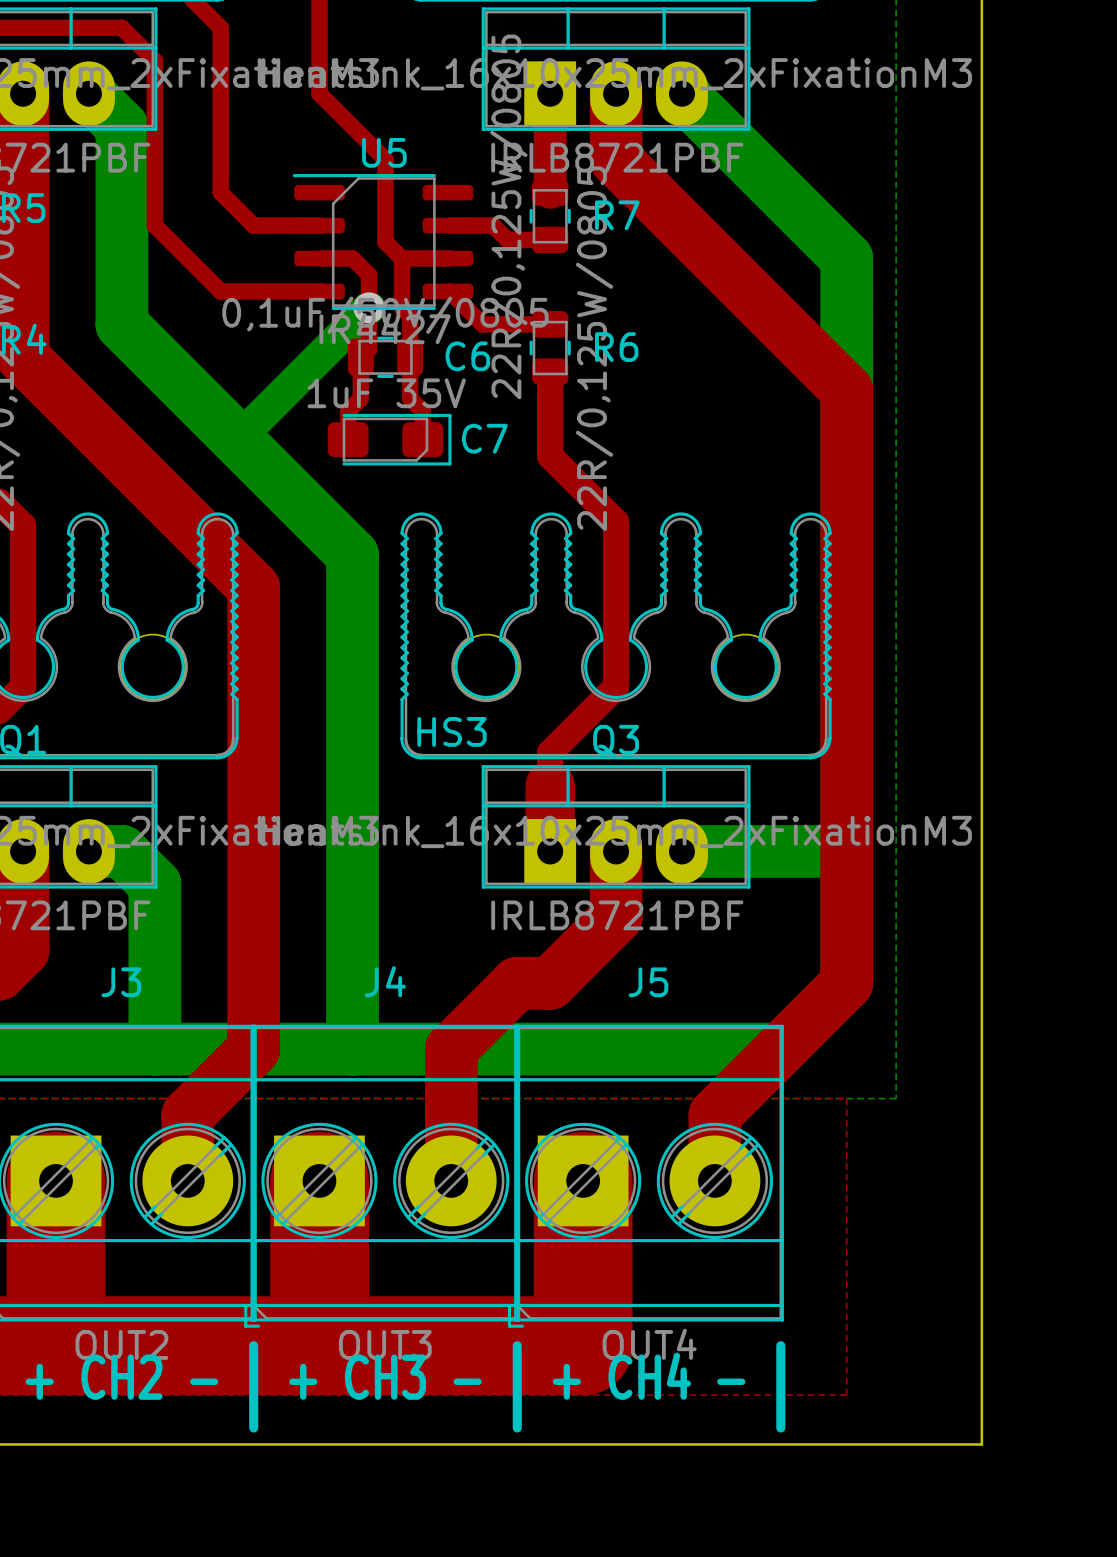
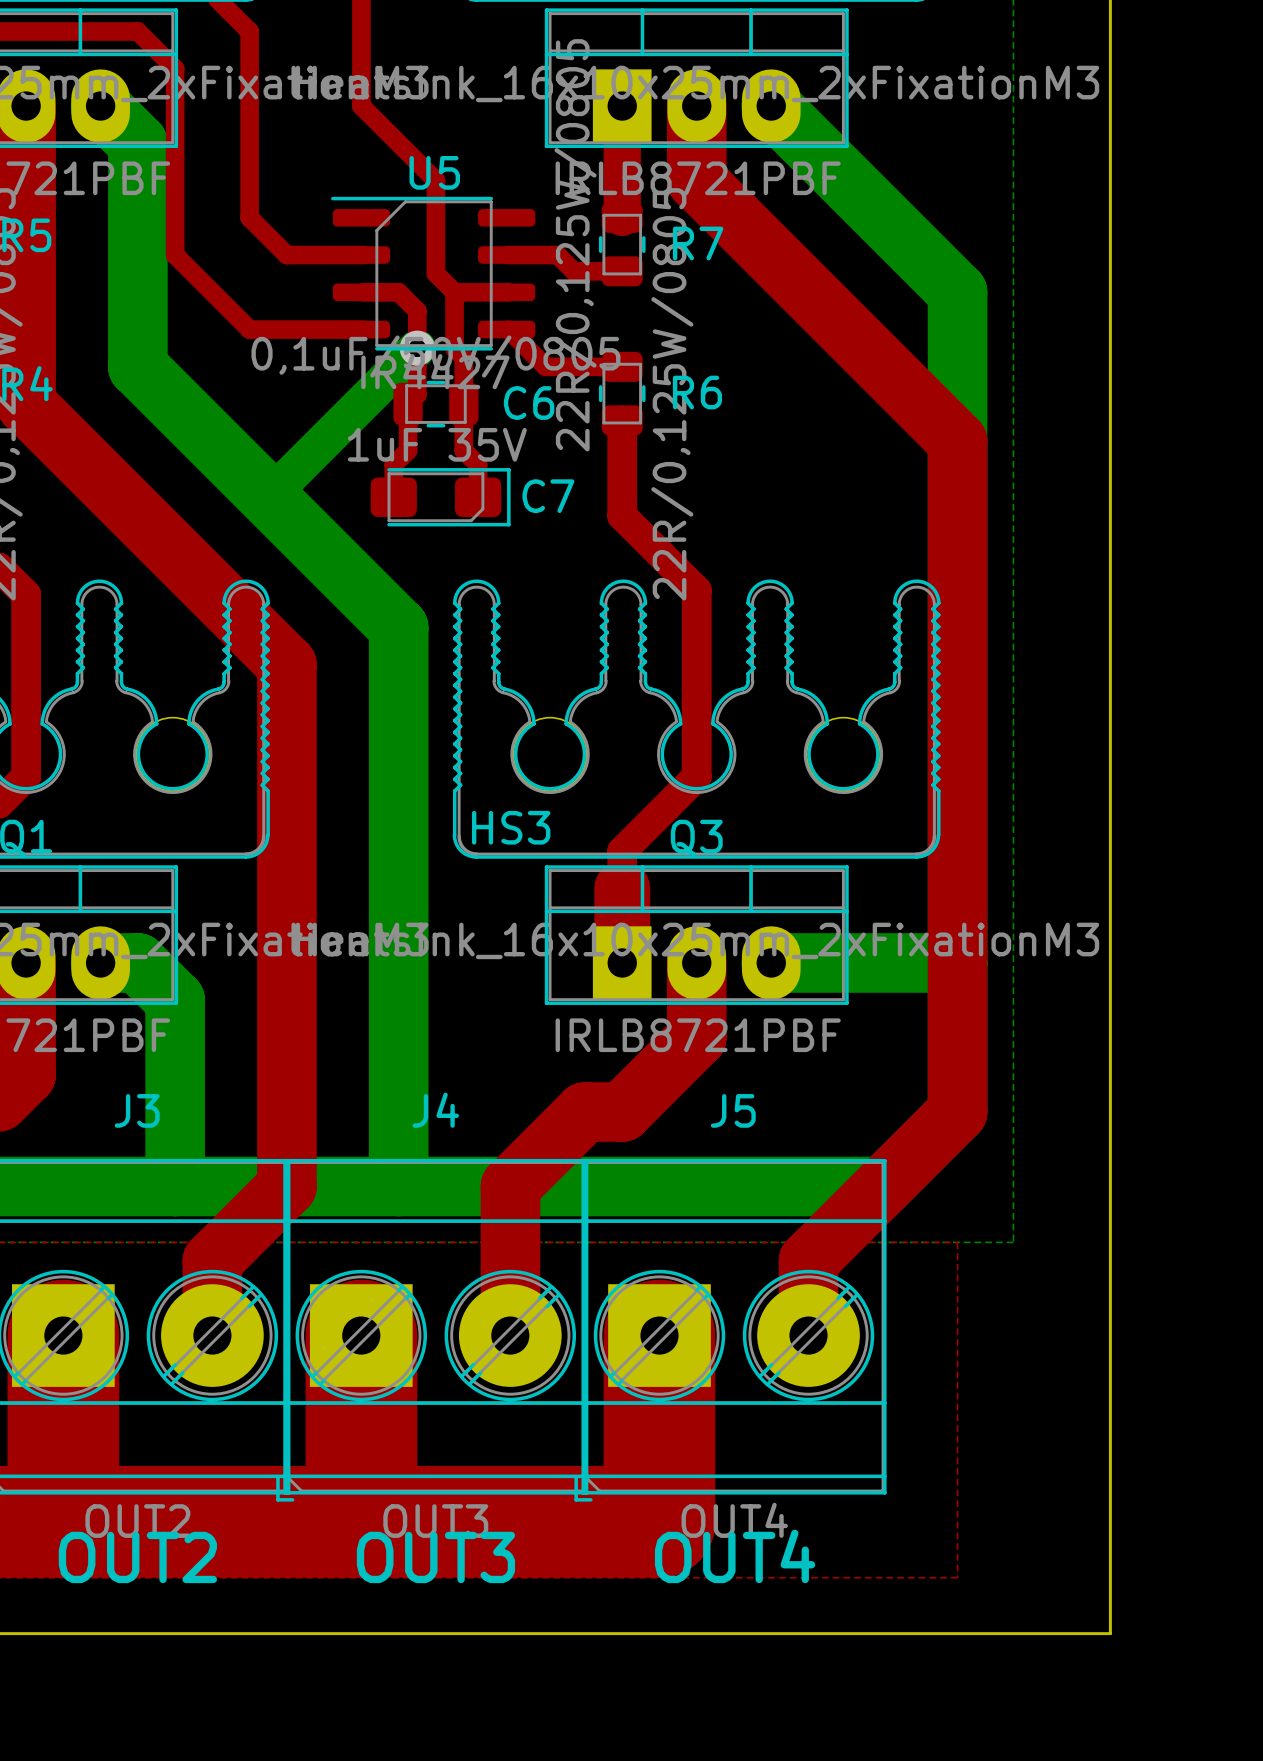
line: (253, 1345) (253, 1428) -> none
line: (517, 1345) (517, 1428) -> none
line: (780, 1345) (780, 1428) -> none
text: + CH4 - (649, 1376) -> OUT4 (735, 1556)
text: + CH2 - (121, 1377) -> OUT2 (137, 1557)
text: + CH3 - (385, 1377) -> OUT3 (435, 1557)

